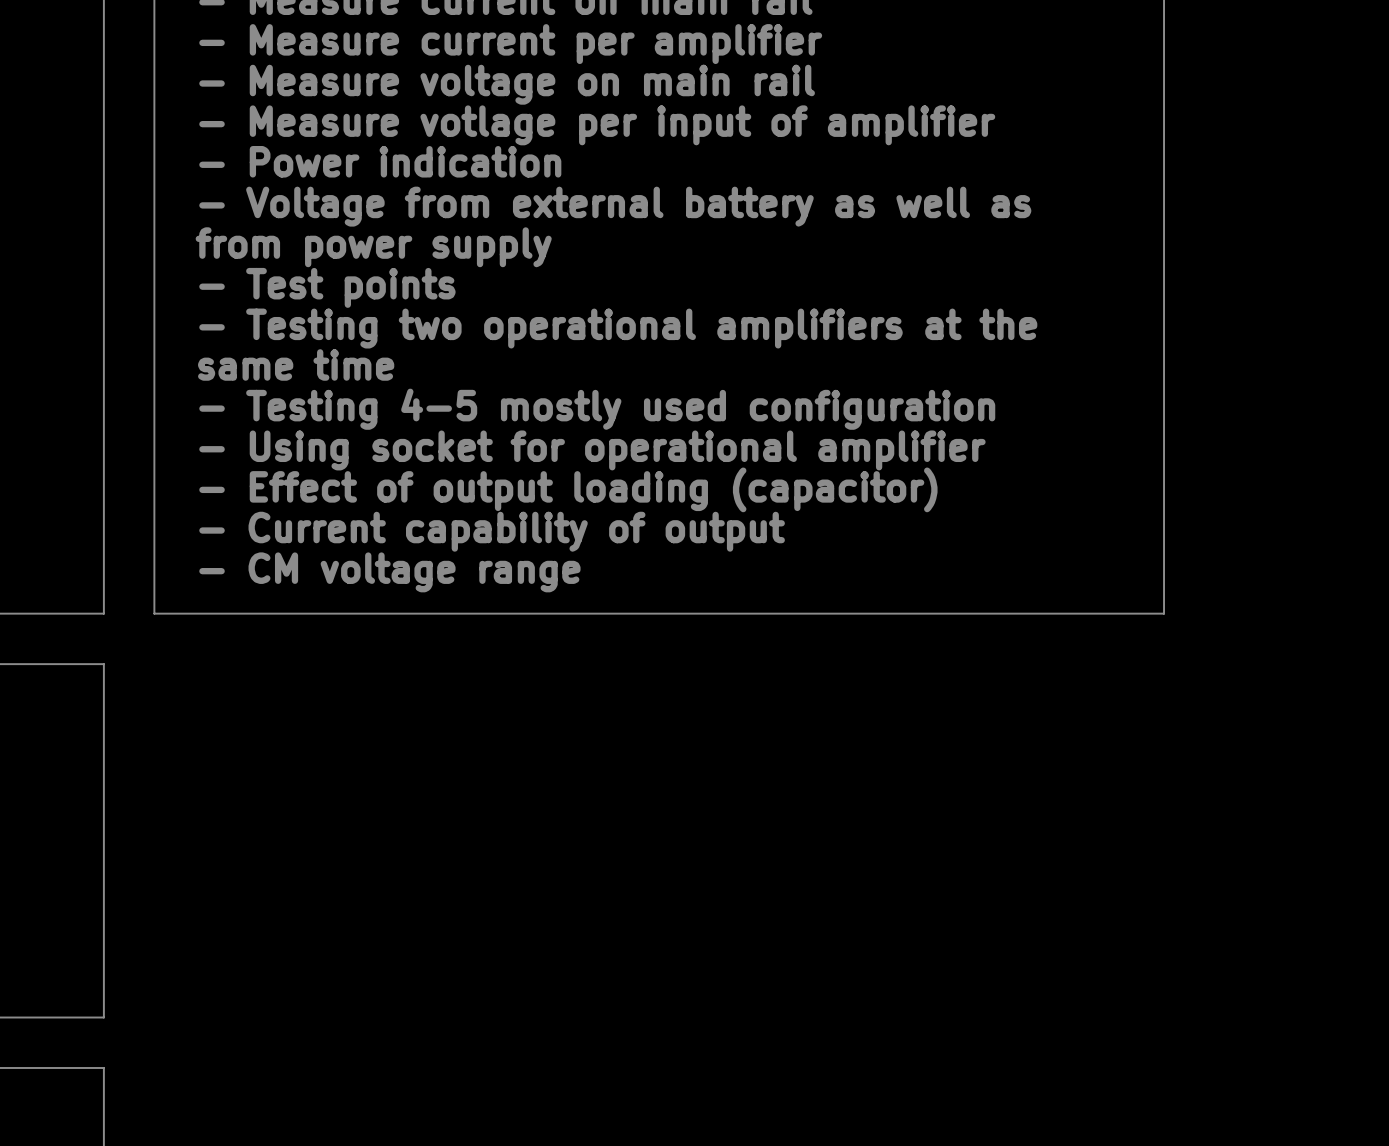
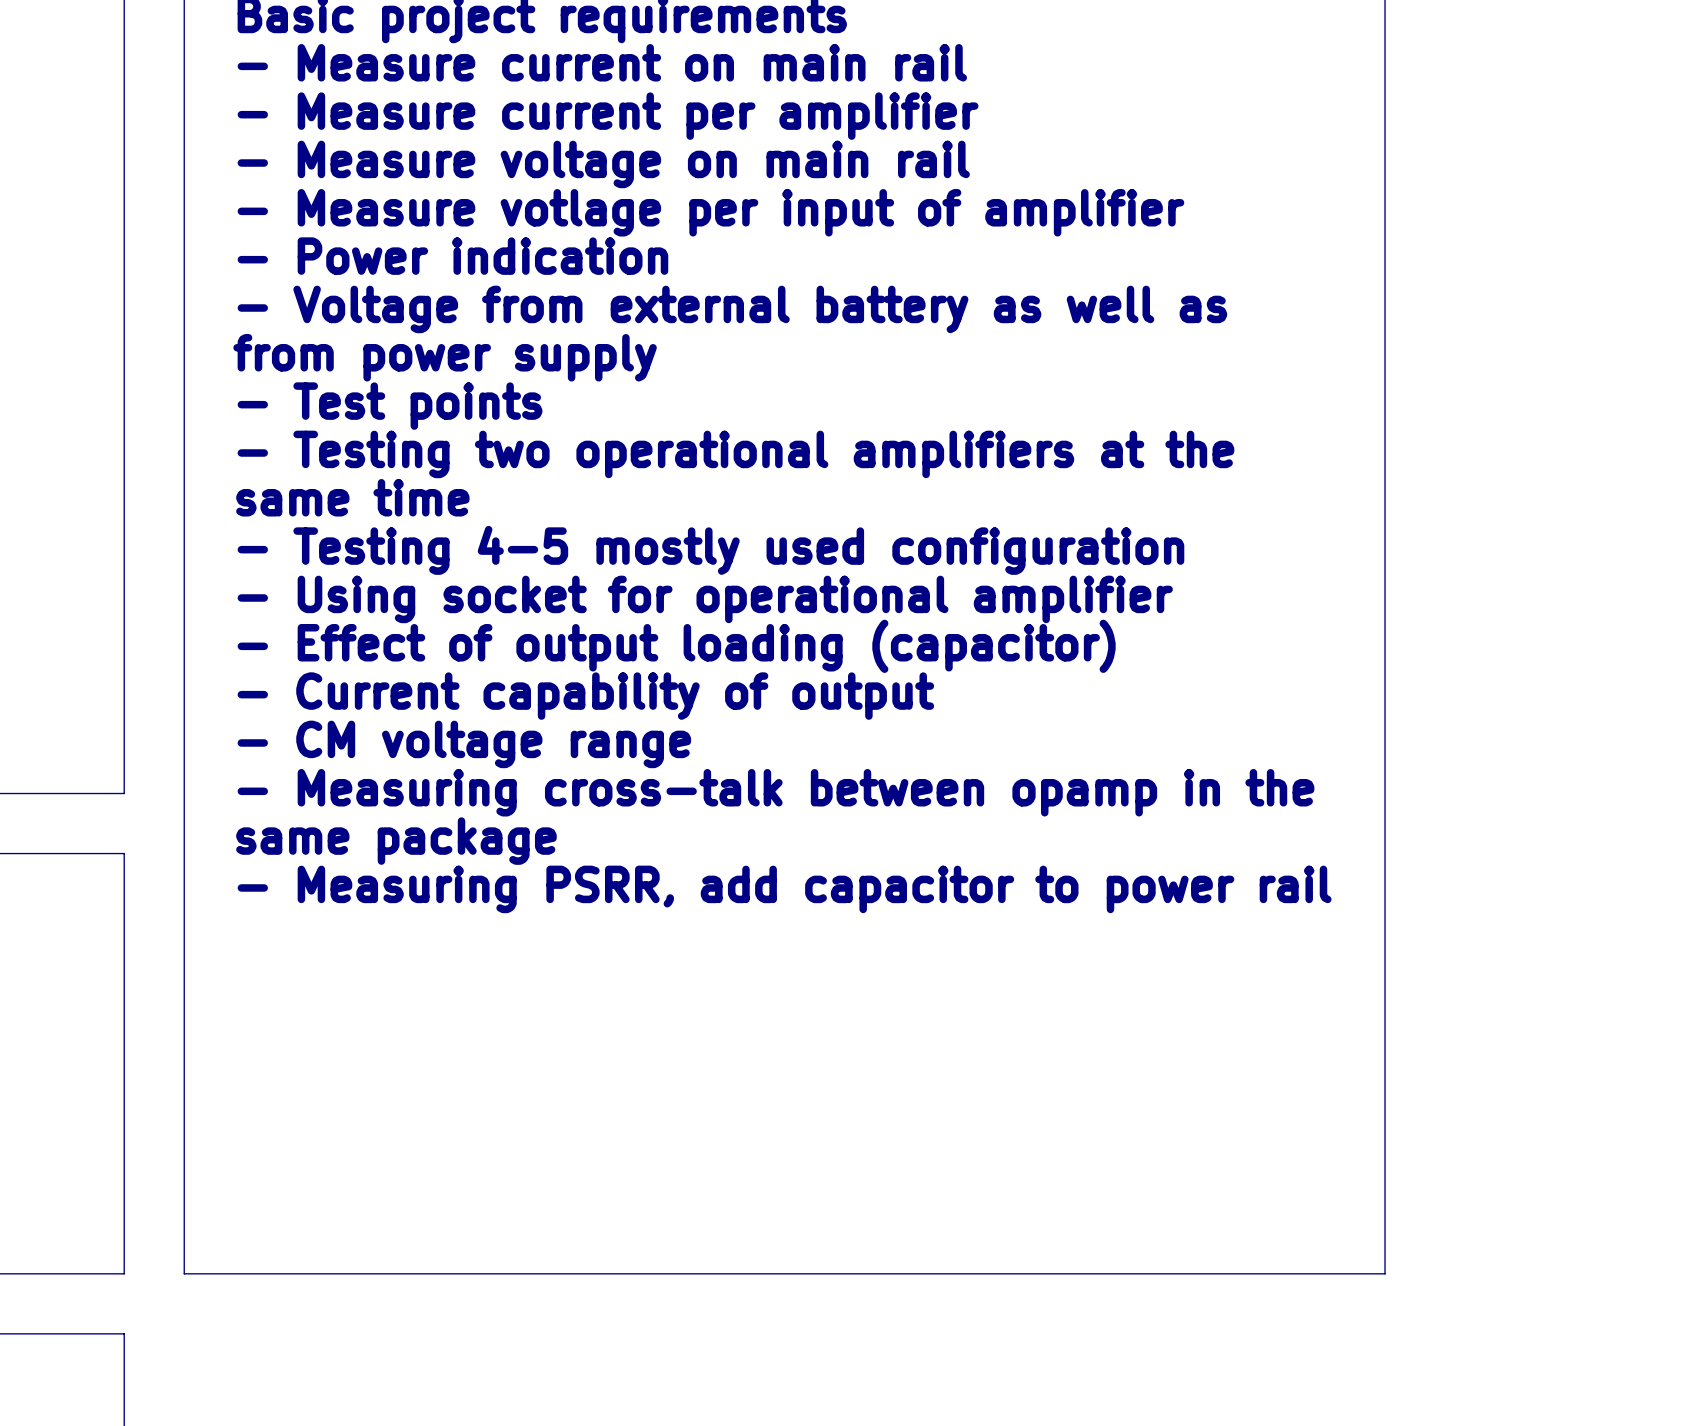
line: (154, 613) (1164, 613) -> (184, 793) (184, 1273) (1385, 1273) (1385, 793)
text: none -> - Measuring cross-talk between opamp in the (775, 792)
text: none -> same package (396, 841)
text: none -> - Measuring PSRR, add capacitor to power rail (784, 889)

